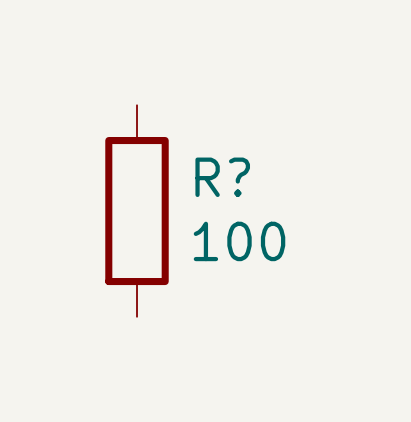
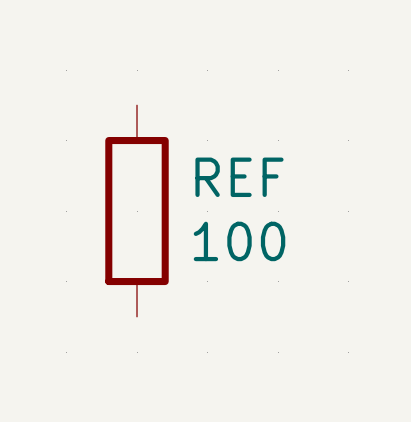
R? name: R? (222, 177) -> REF (239, 177)

